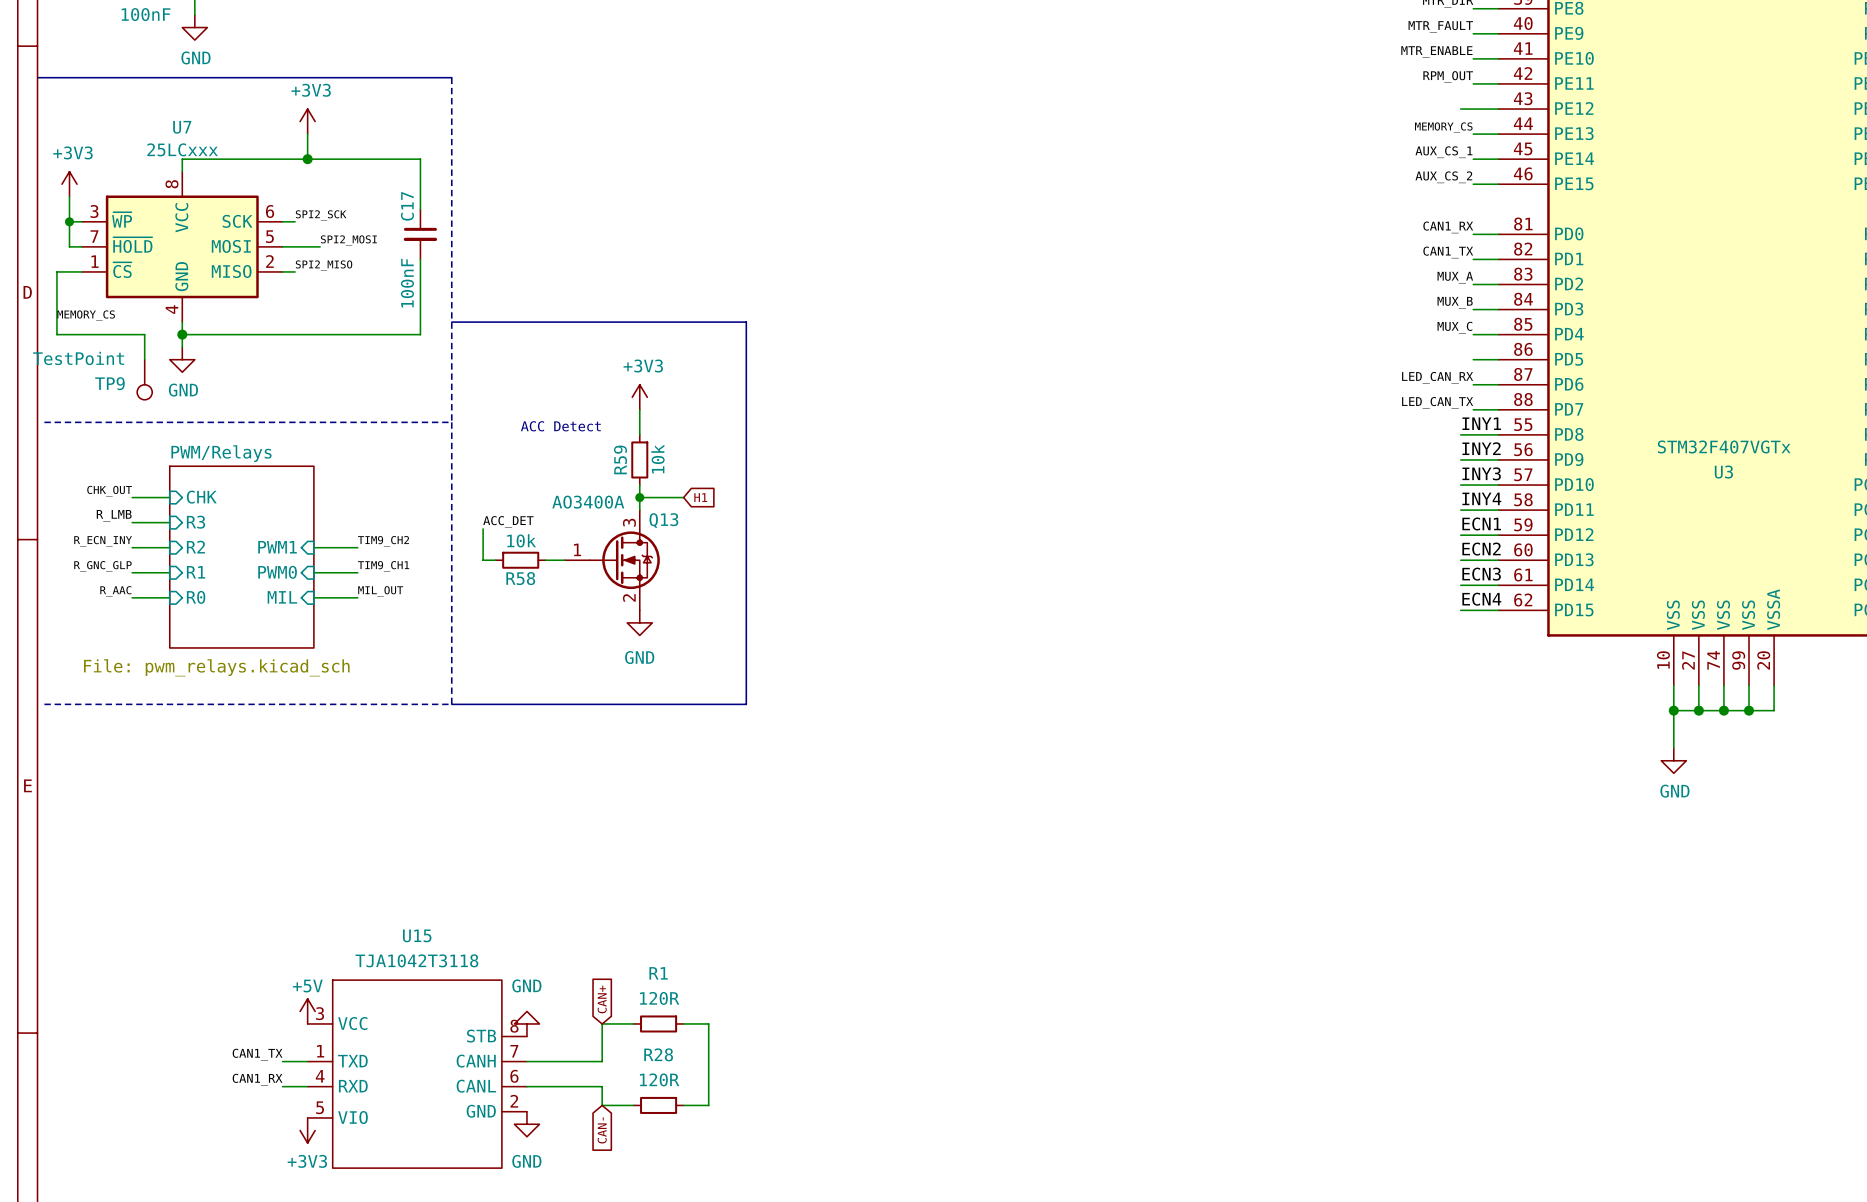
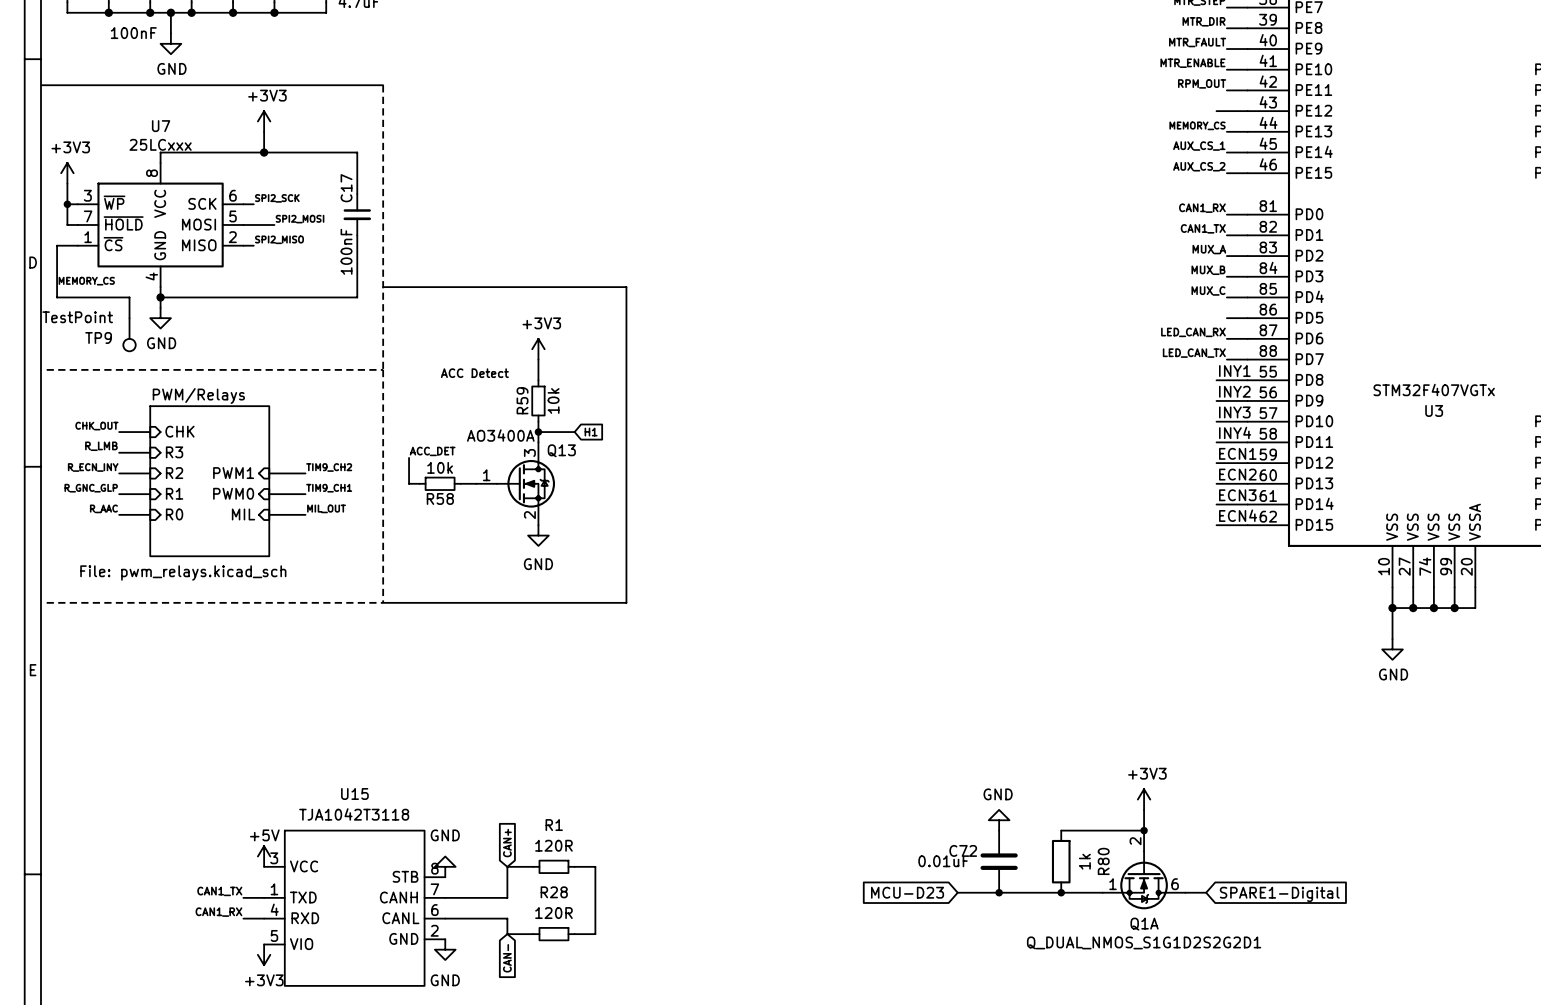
power symbol: none -> +3V3 (1144, 799)
wire: none -> (1144, 809) (1144, 830) (1061, 830)
power symbol: none -> GND (999, 820)
junction: none -> (1144, 830)
C72: none -> 0.01uF (999, 861)
R80: none -> 1k (1061, 861)
Q1A: none -> Q_DUAL_NMOS_S1G1D2S2G2D1 (1144, 869)
global label: none -> MCU-D23 (907, 892)
wire: none -> (957, 892) (1102, 892)
junction: none -> (999, 892)
junction: none -> (1061, 892)
wire: none -> (1185, 892) (1206, 892)
global label: none -> SPARE1-Digital (1279, 894)

